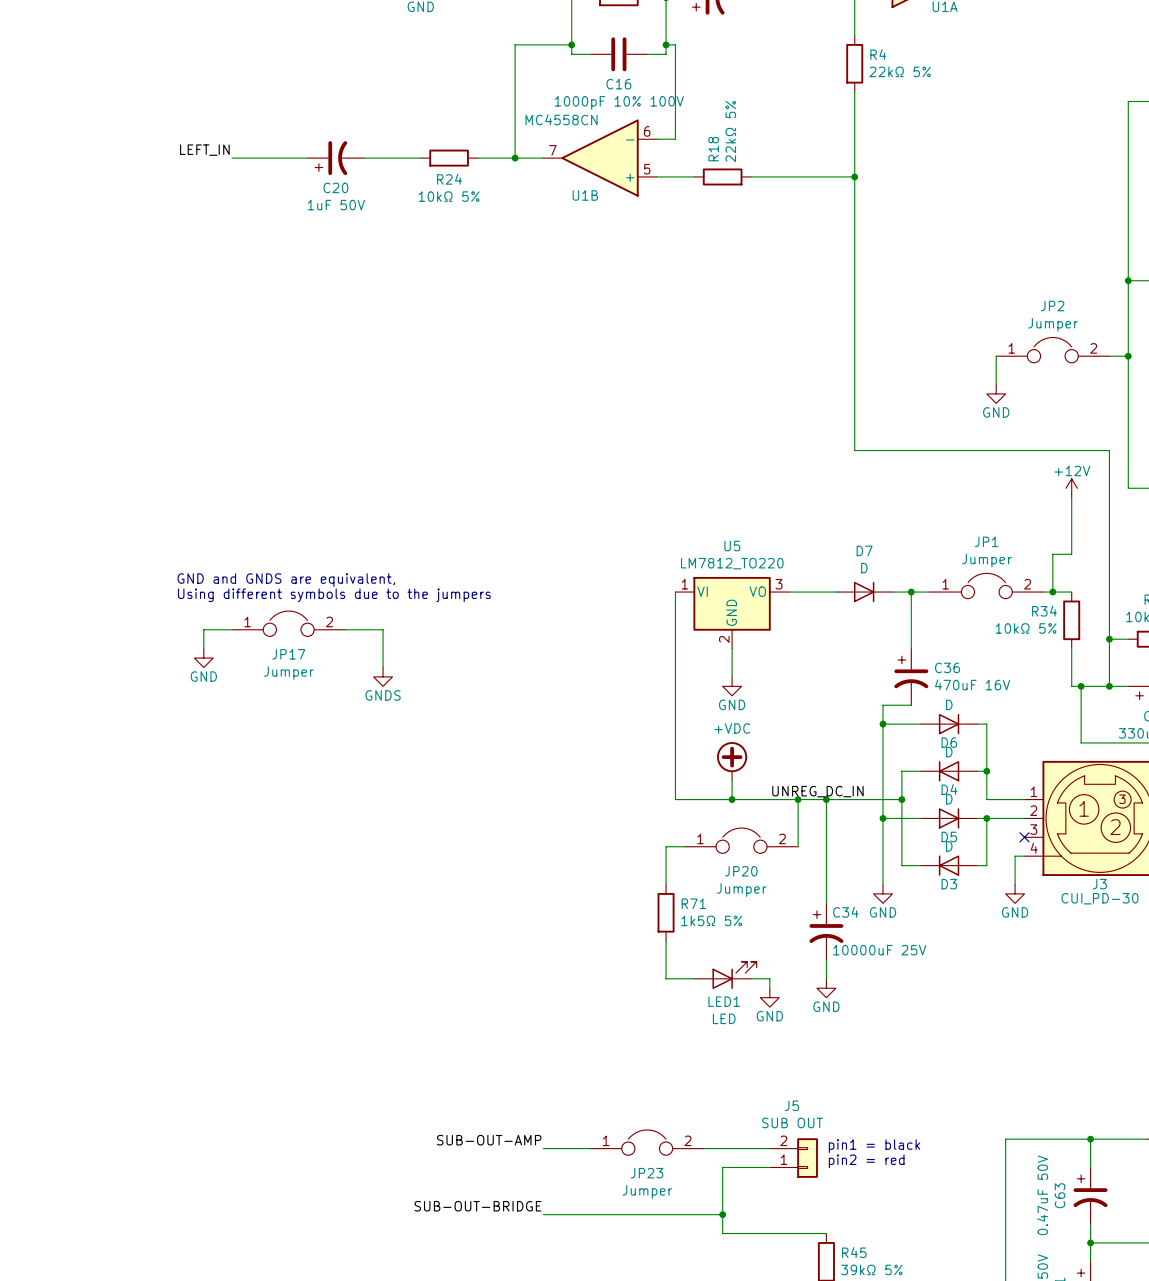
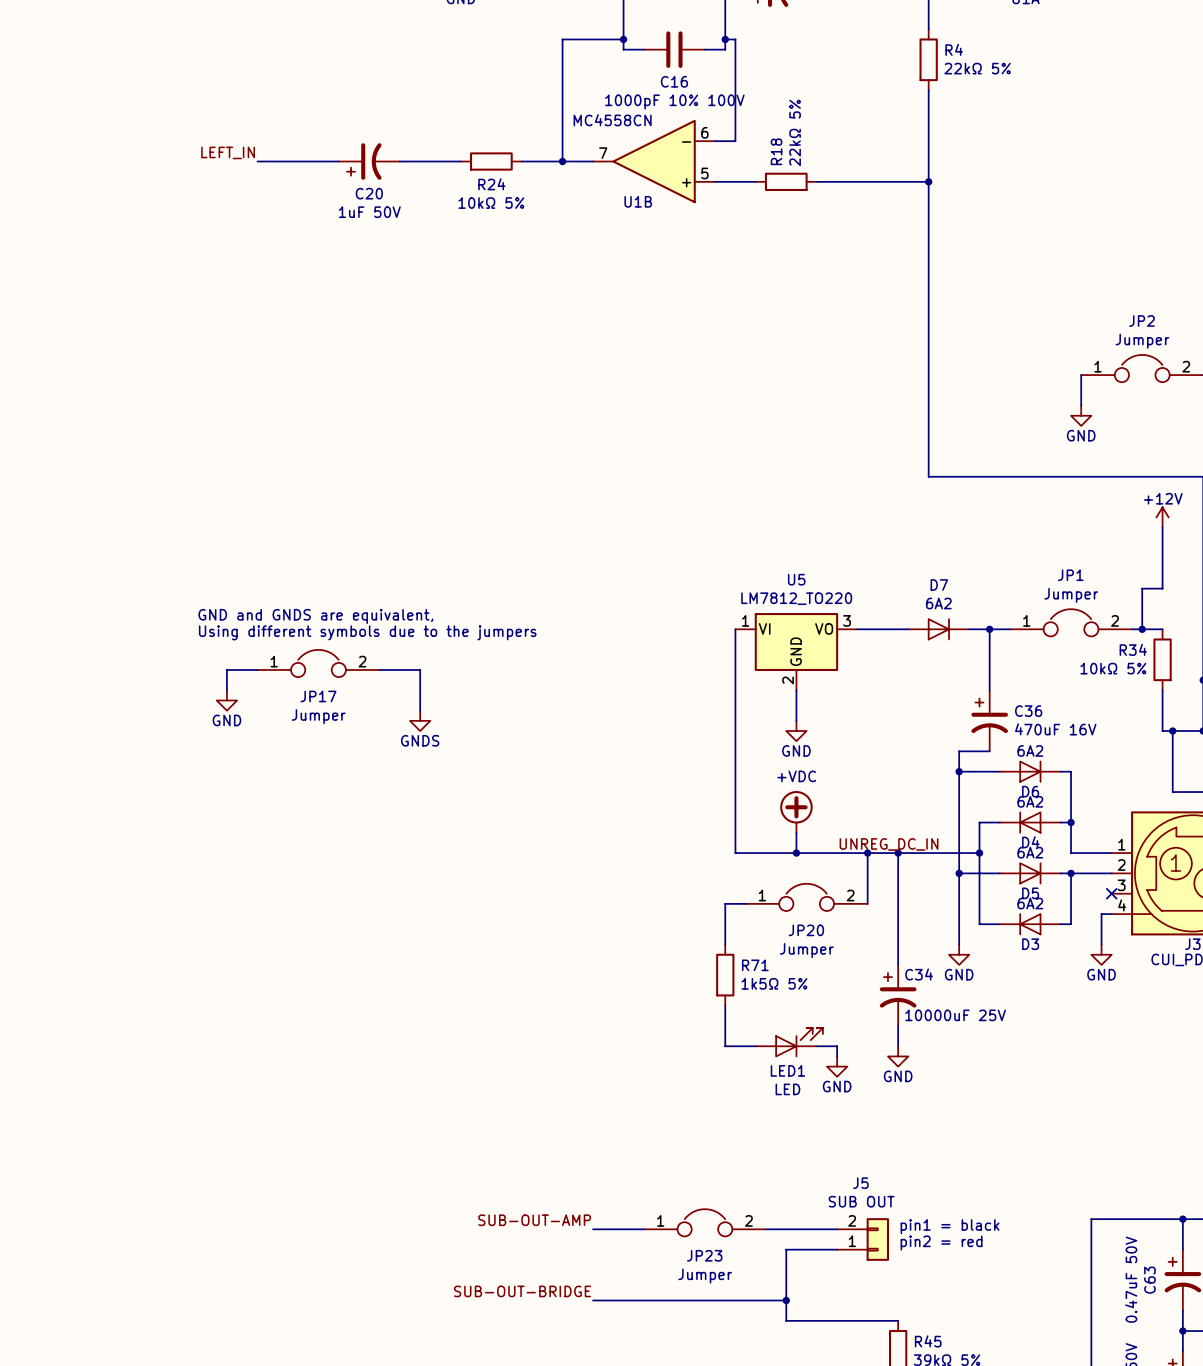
D7 value: D (864, 568) -> 6A2 (938, 603)
D6 value: D (949, 704) -> 6A2 (1030, 750)
D4 value: D (949, 752) -> 6A2 (1030, 801)
D5 value: D (949, 799) -> 6A2 (1030, 852)
D3 value: D (949, 846) -> 6A2 (1030, 903)

